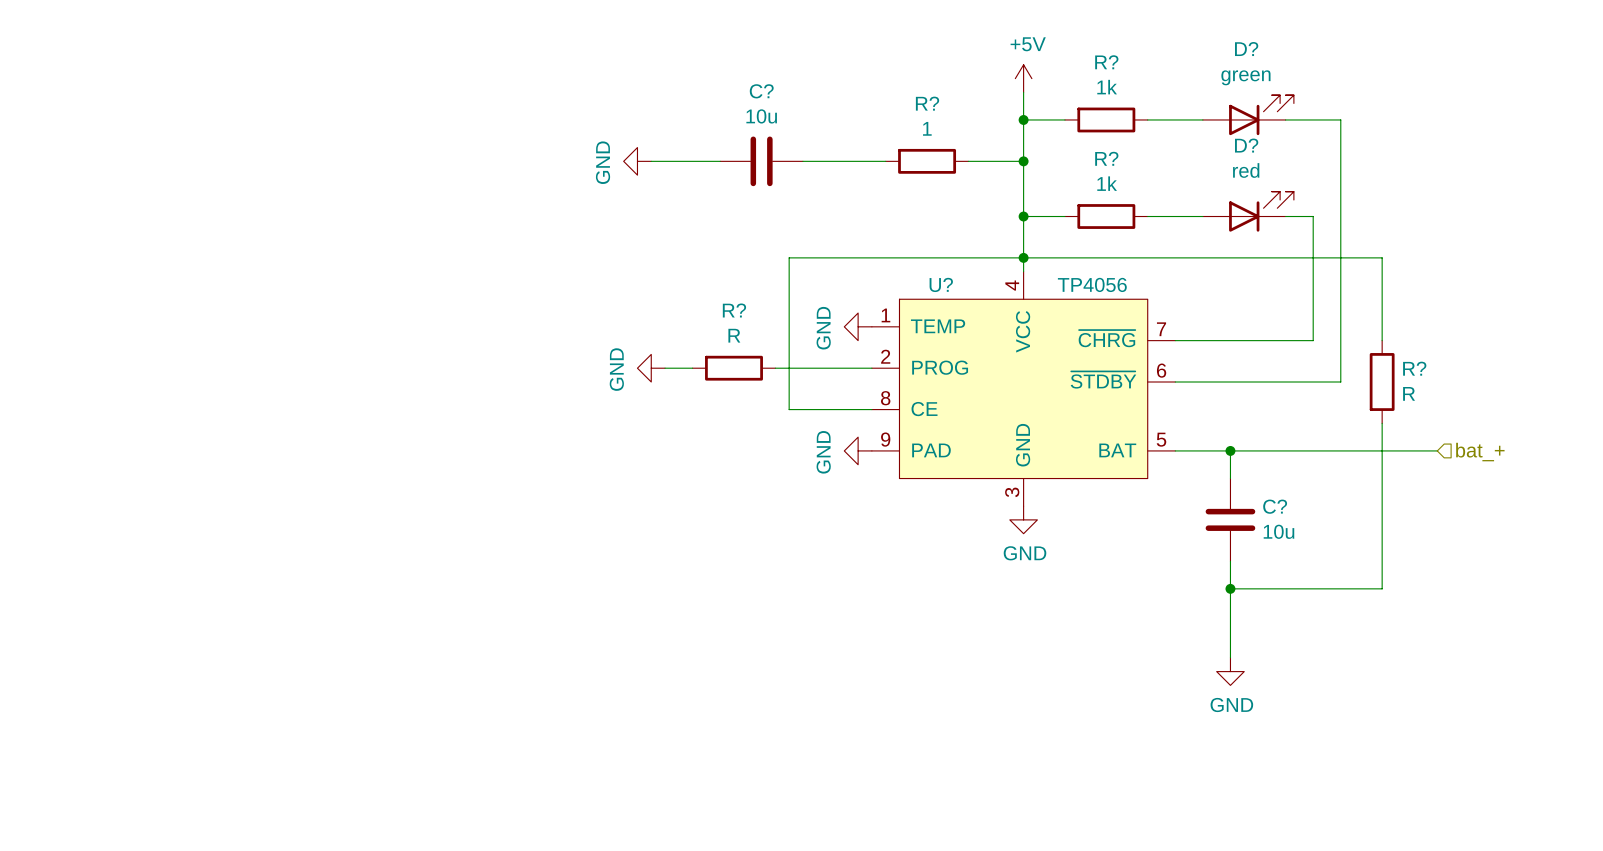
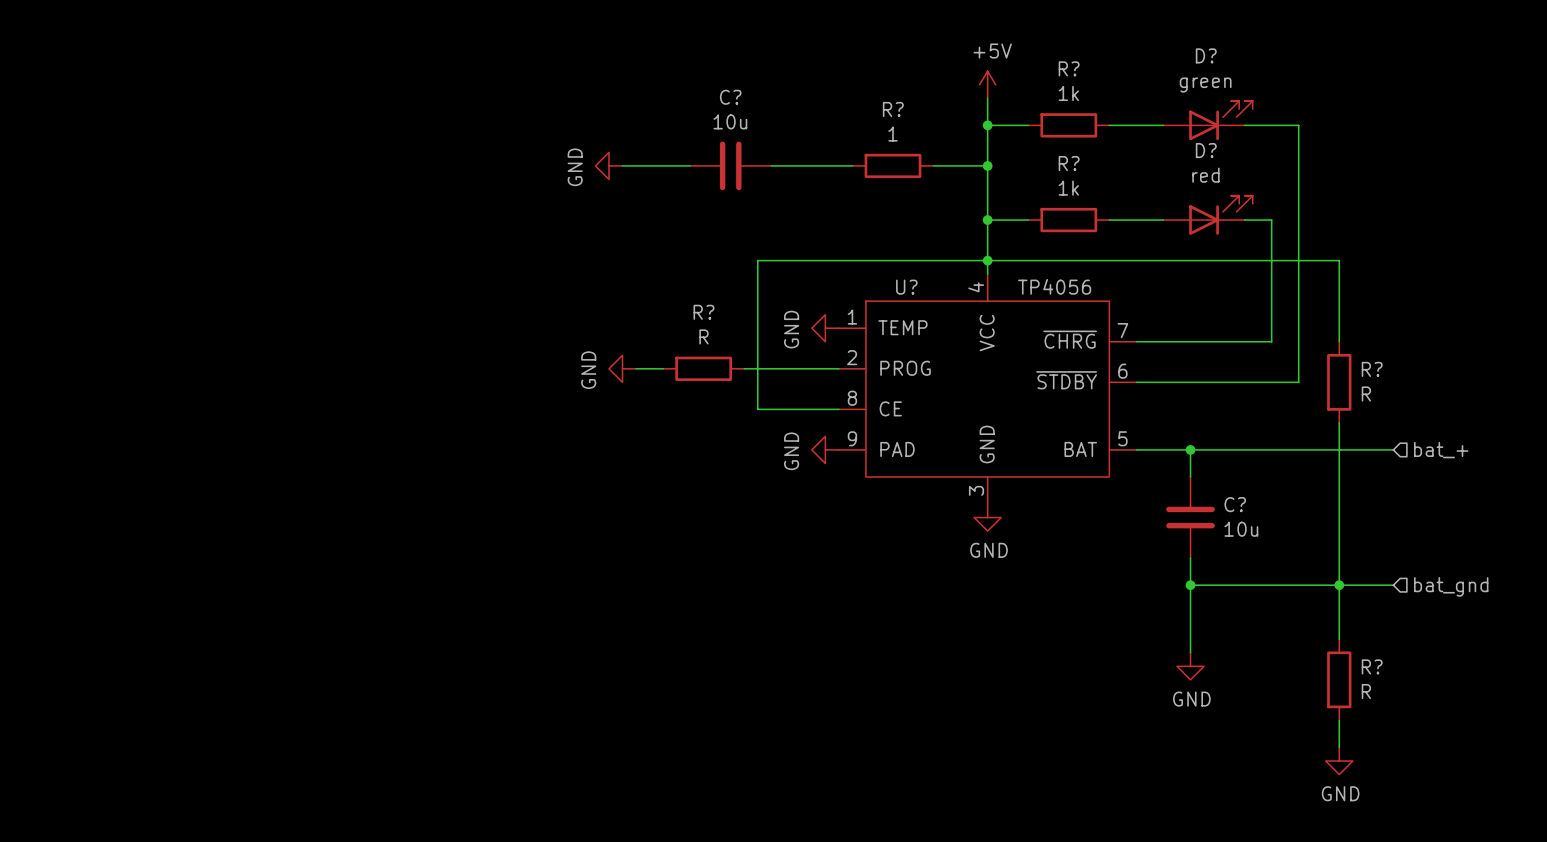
junction: none -> (1339, 585)
wire: none -> (1393, 585) (1339, 585) (1339, 639)
hierarchical label: none -> bat_gnd (1451, 586)
R?: none -> R (1339, 679)
wire: none -> (1339, 720) (1339, 747)
power symbol: none -> GND (1339, 761)

